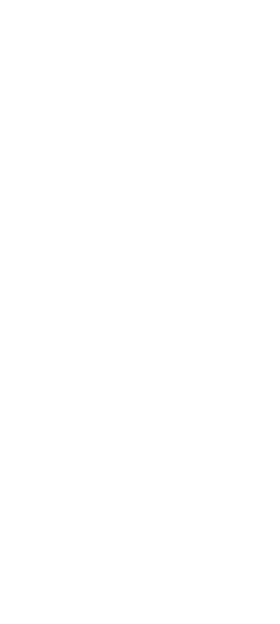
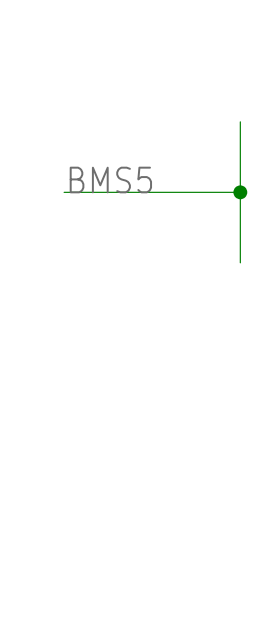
wire: none -> (240, 121) (240, 262)
label: none -> BMS5 (110, 180)
wire: none -> (64, 192) (240, 192)
junction: none -> (240, 192)

